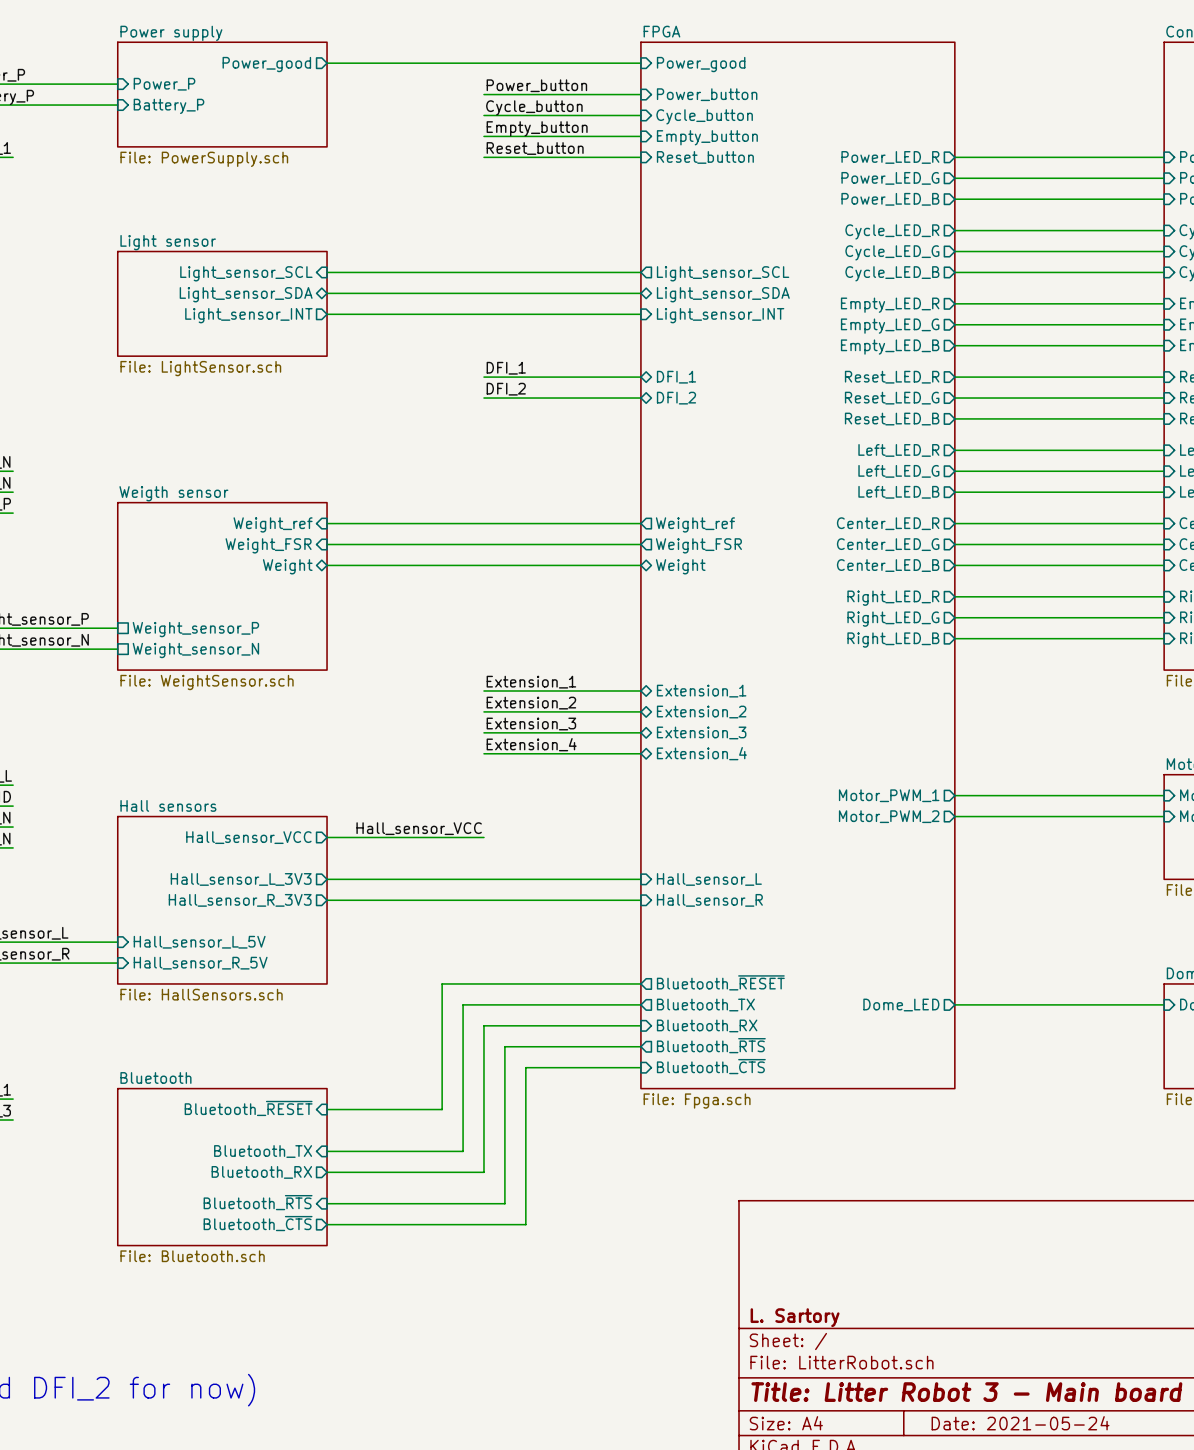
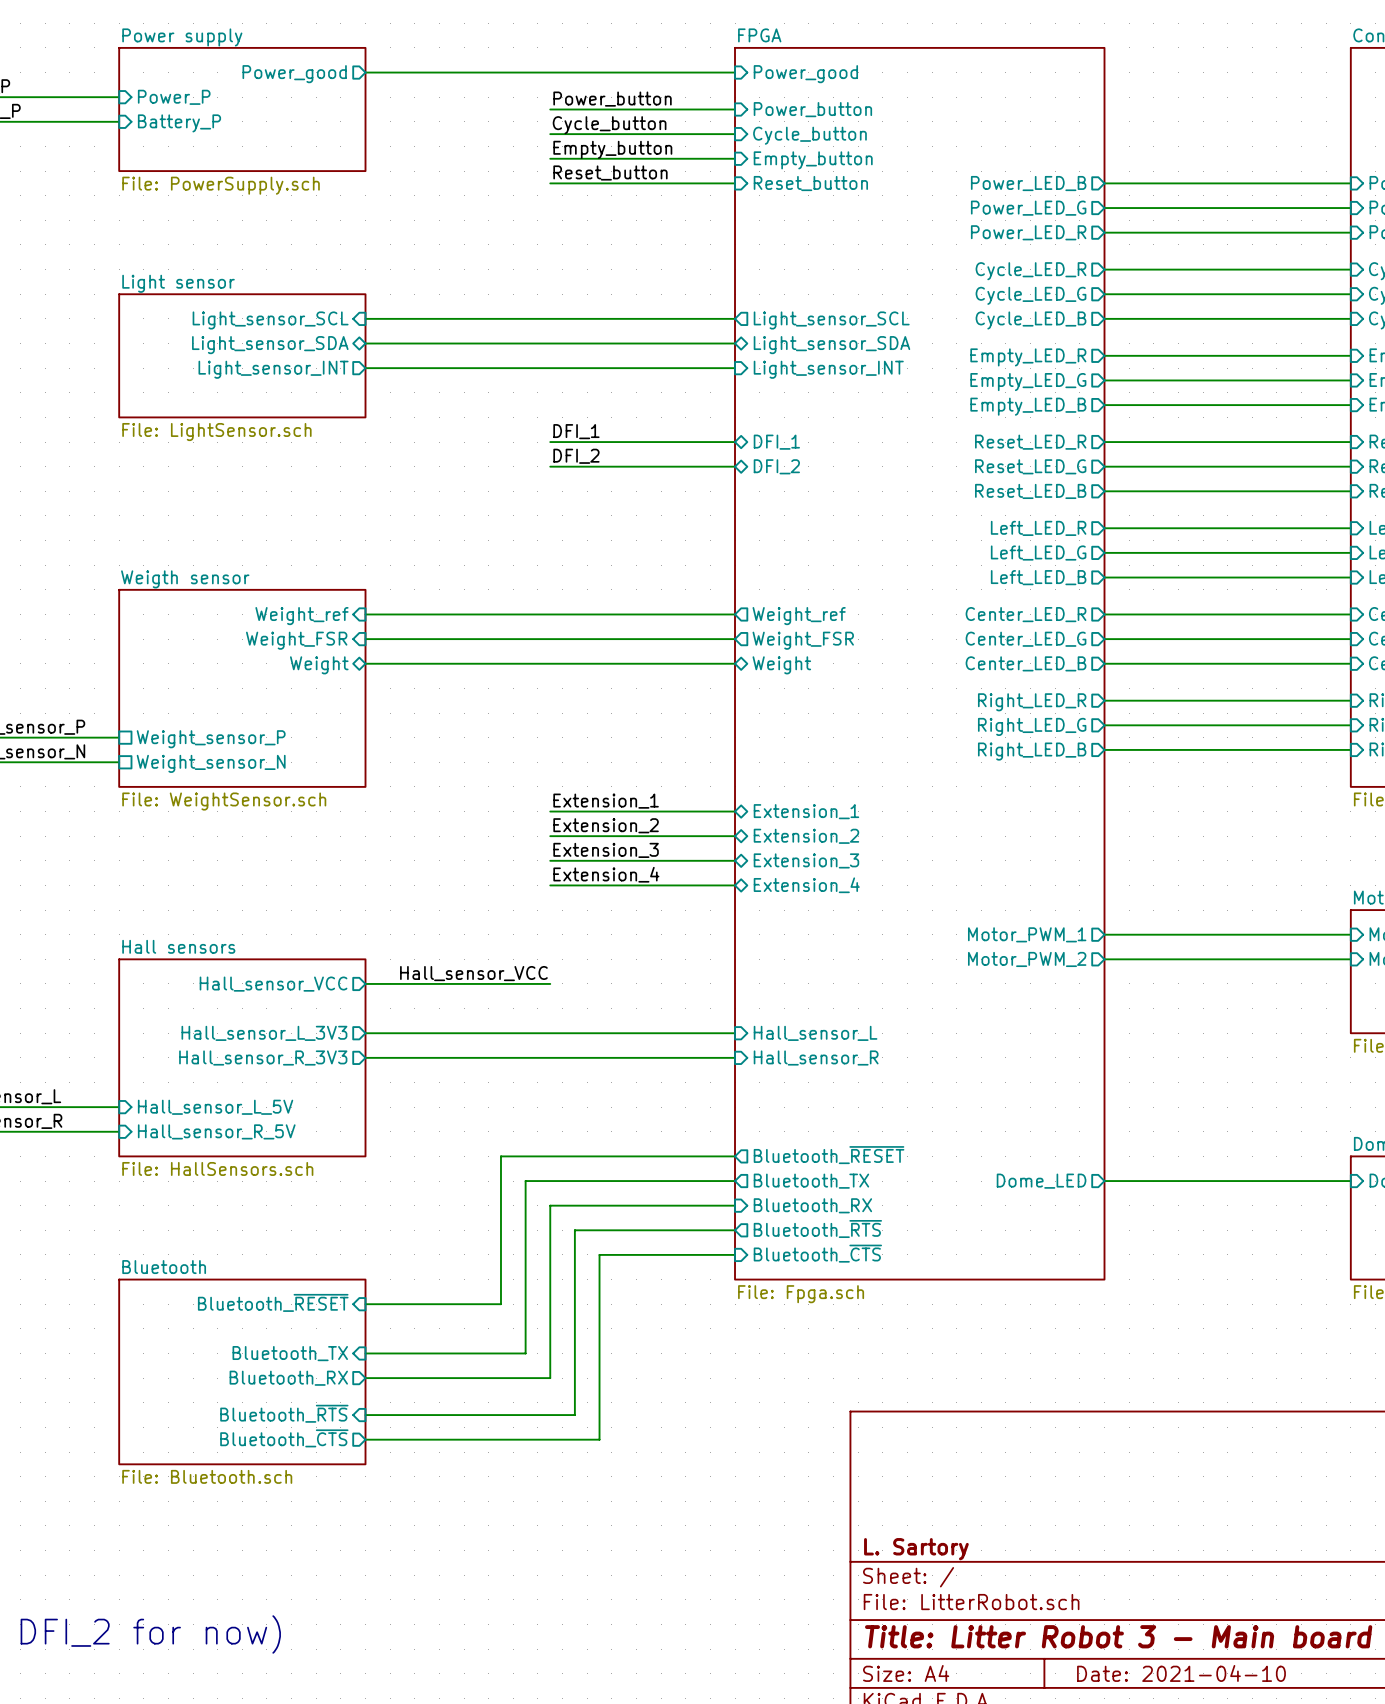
sheet pin: Power_LED_R (890, 157) -> Power_LED_B (1028, 183)
sheet pin: Power_LED_B (890, 199) -> Power_LED_R (1028, 232)
title block: Date: 2021-05-24 (1020, 1423) -> Date: 2021-04-10 (1181, 1673)

